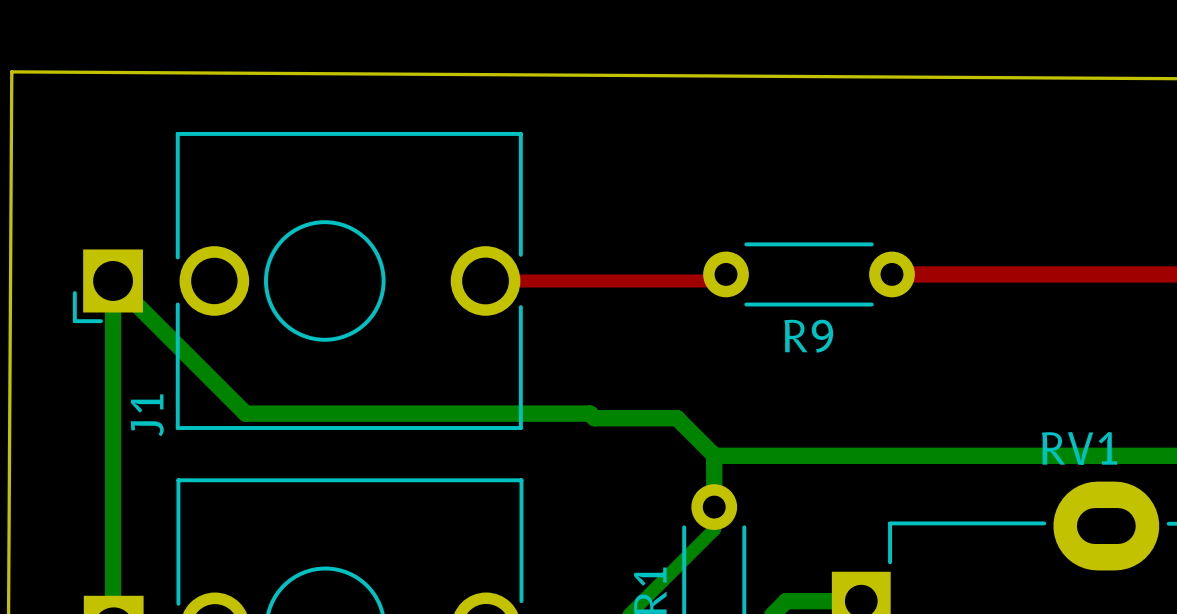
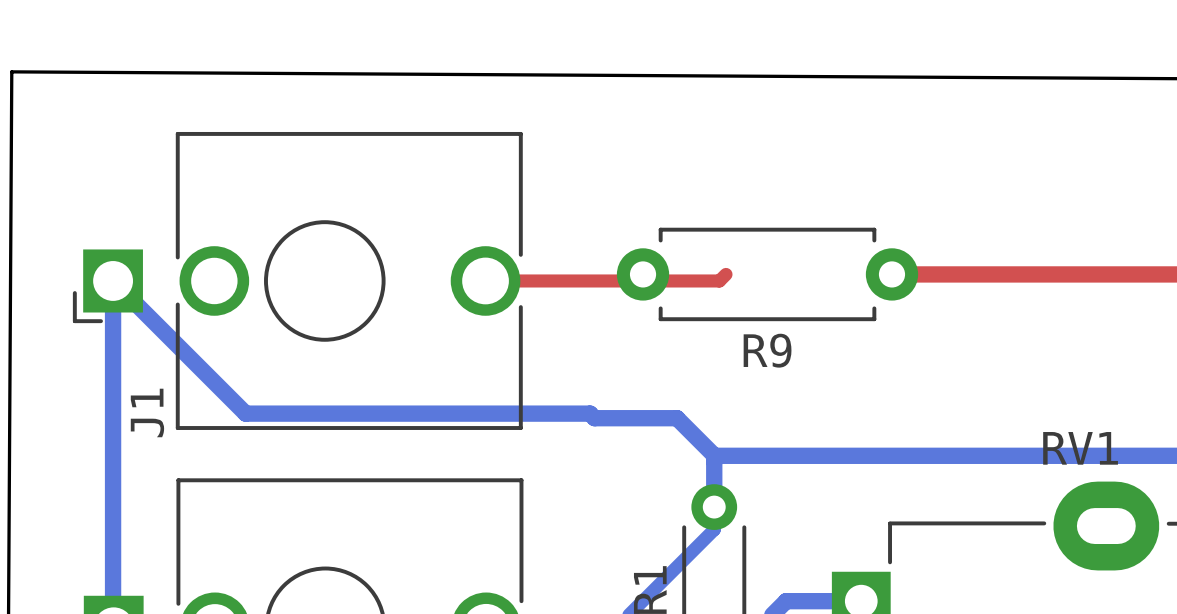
R9 footprint: [703, 242, 915, 307] -> [616, 227, 919, 322]

